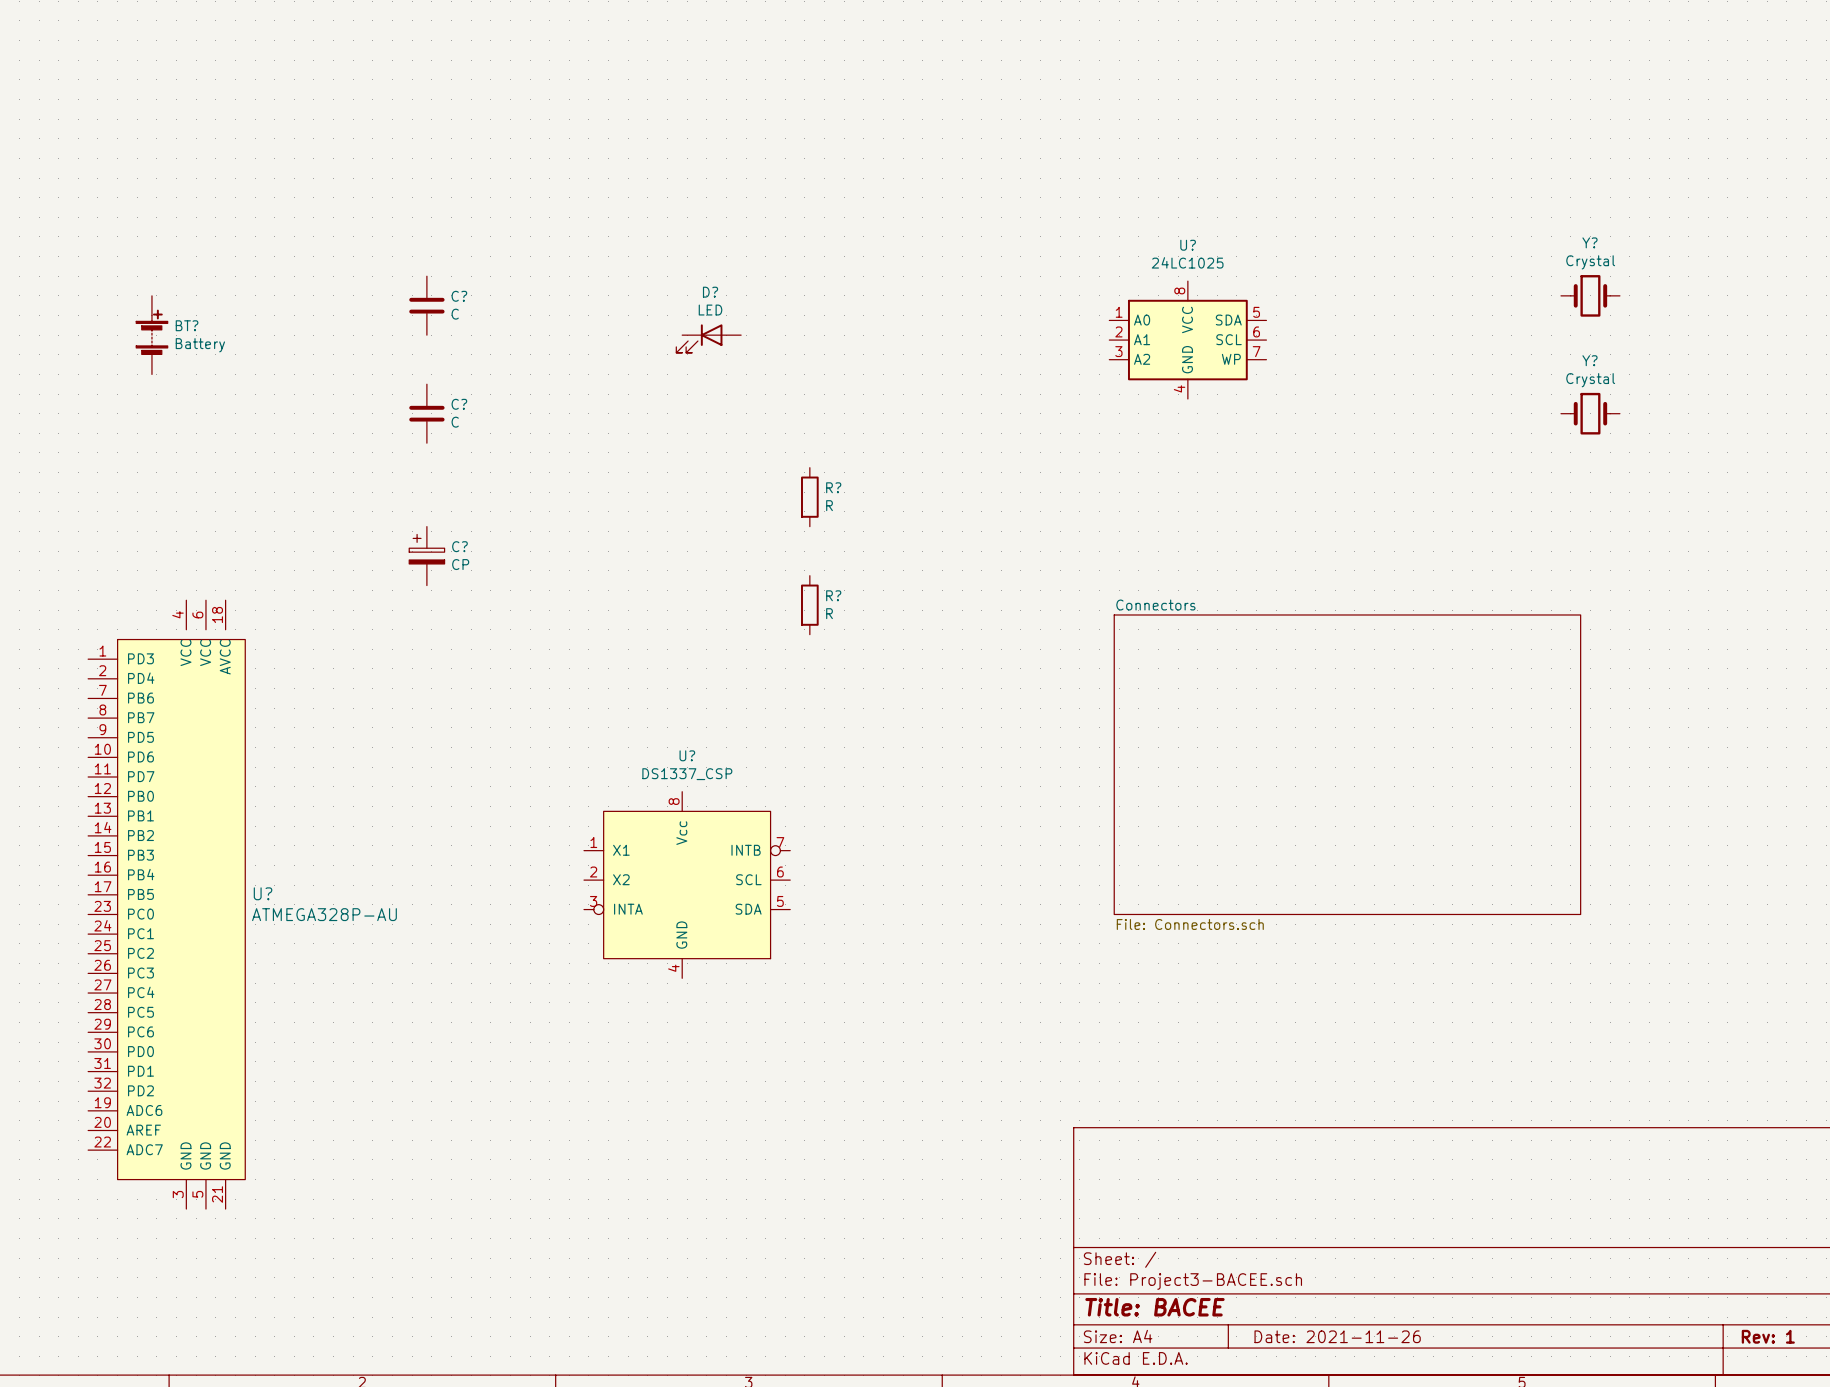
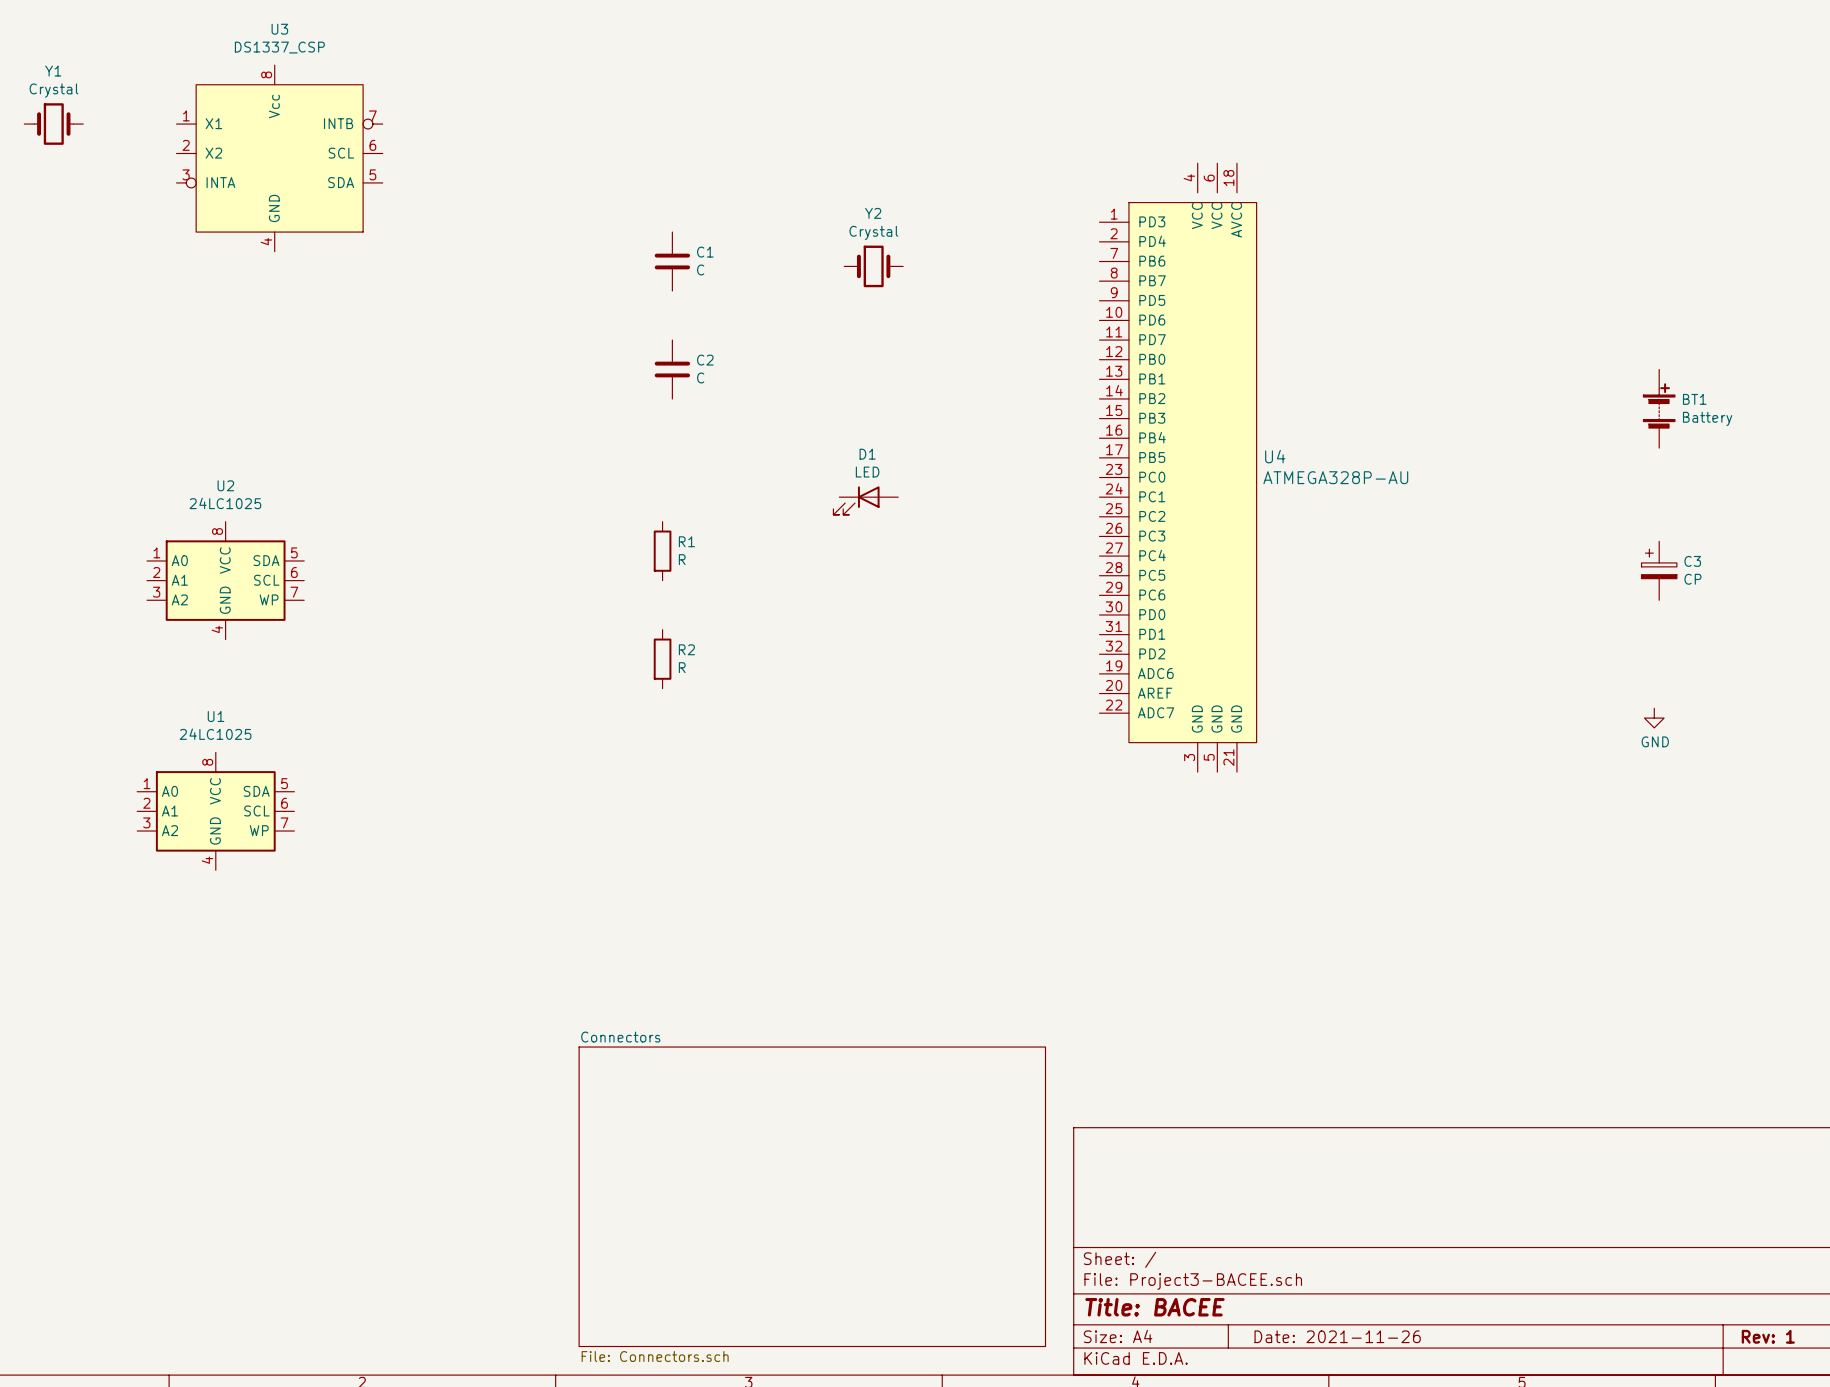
Y1: none -> Crystal (53, 124)
U3: none -> DS1337_CSP (279, 158)
C1: none -> C (672, 261)
Y2: none -> Crystal (873, 266)
Y?: Crystal (1590, 295) -> none
C?: C (426, 305) -> none
BT?: Battery (151, 335) -> none
D?: LED (708, 338) -> none
U?: 24LC1025 (1187, 340) -> none
C2: none -> C (672, 369)
BT1: none -> Battery (1659, 408)
C?: C (426, 413) -> none
Y?: Crystal (1590, 413) -> none
U4: none -> ATMEGA328P-AU (1178, 467)
R?: R (809, 497) -> none
D1: none -> LED (865, 500)
R1: none -> R (662, 551)
C?: CP (426, 556) -> none
C3: none -> CP (1659, 570)
U2: none -> 24LC1025 (225, 580)
R?: R (809, 605) -> none
R2: none -> R (662, 659)
power symbol: none -> GND (1654, 718)
sheet Connectors: File: Connectors.sch (1347, 764) -> none
U1: none -> 24LC1025 (215, 811)
U?: DS1337_CSP (687, 885) -> none
U?: ATMEGA328P-AU (166, 904) -> none
sheet Connectors: none -> File: Connectors.sch (812, 1196)

